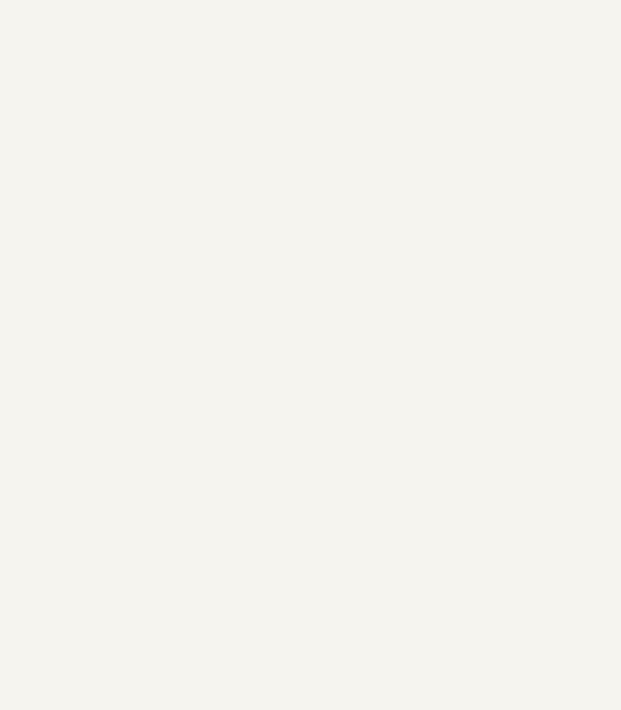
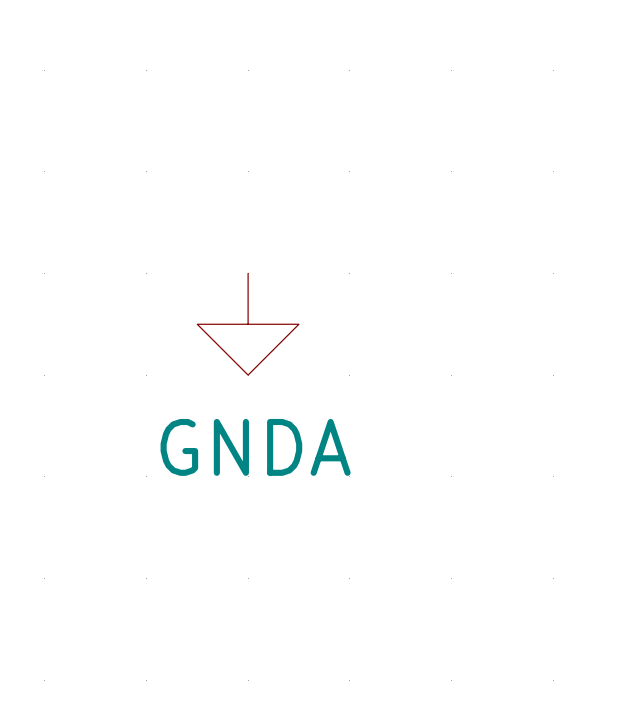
power symbol: none -> GNDA (248, 324)

